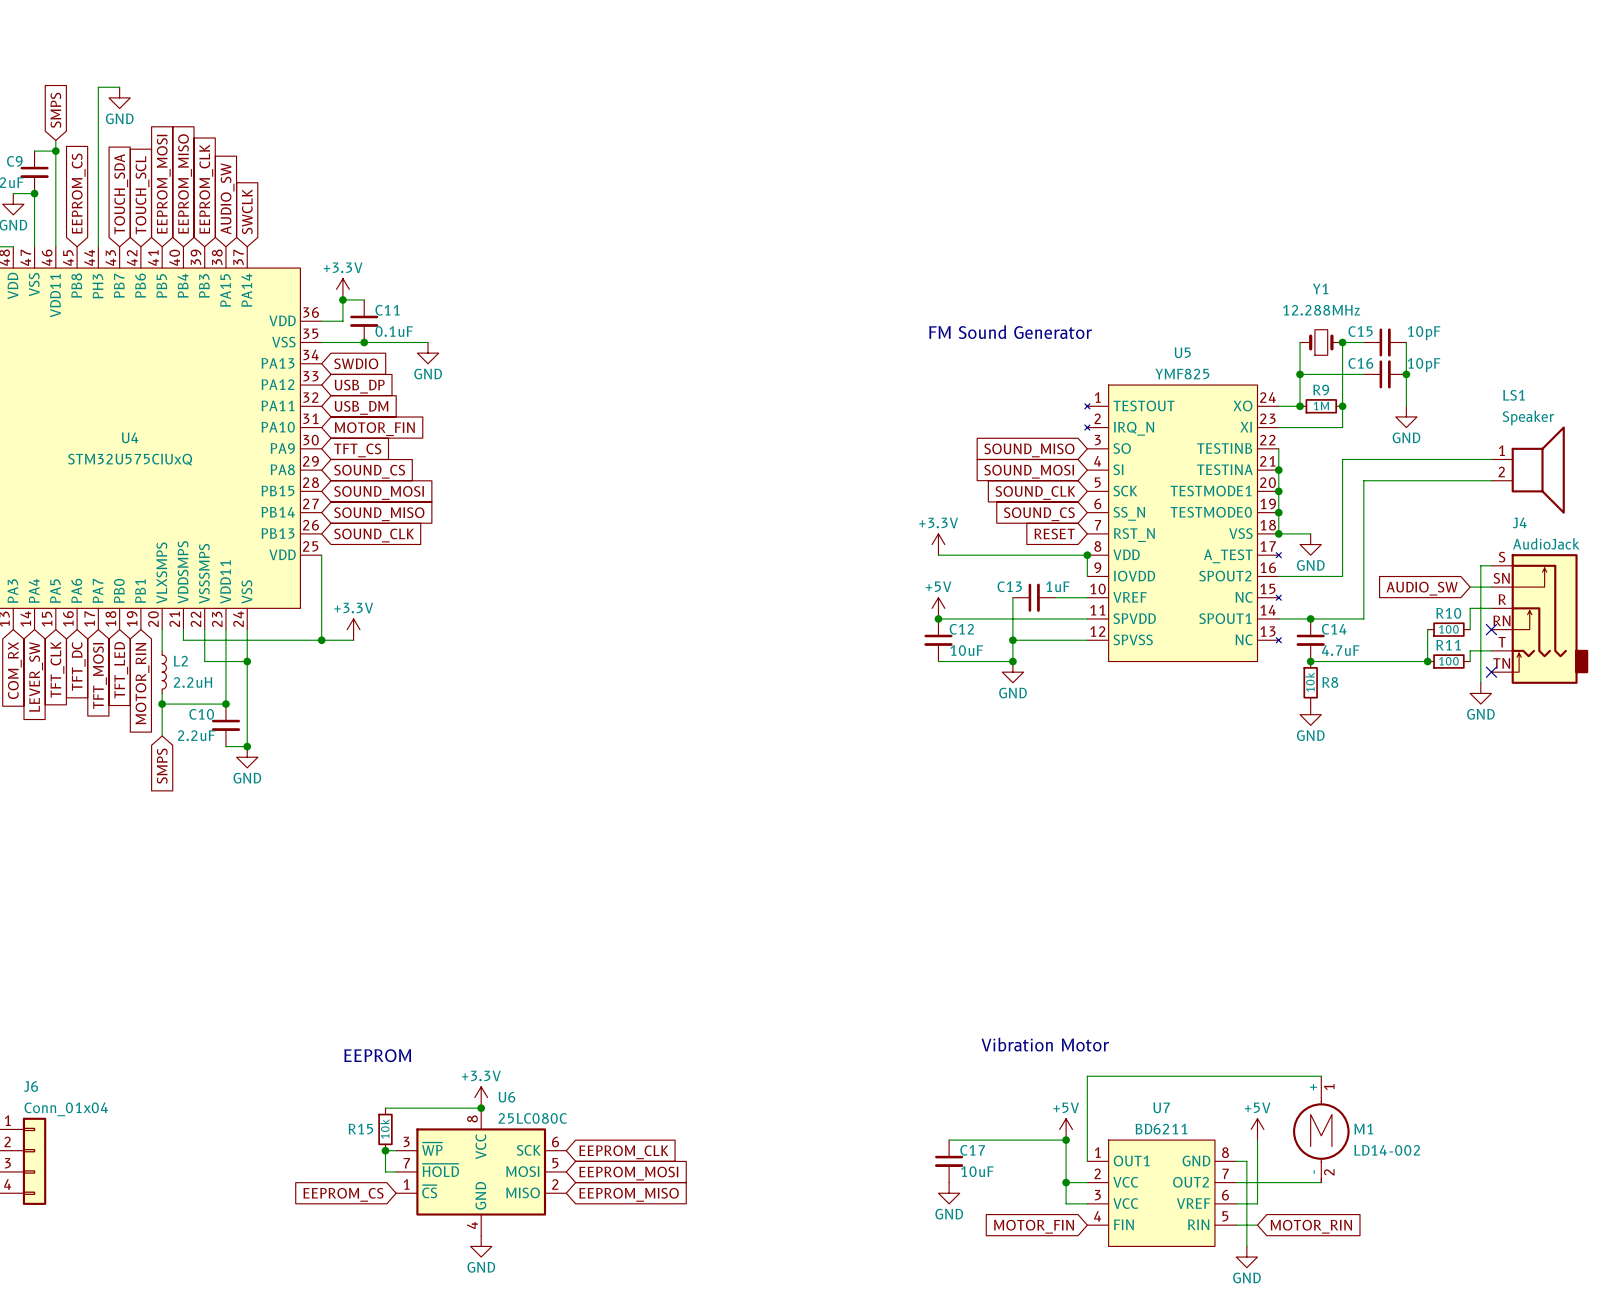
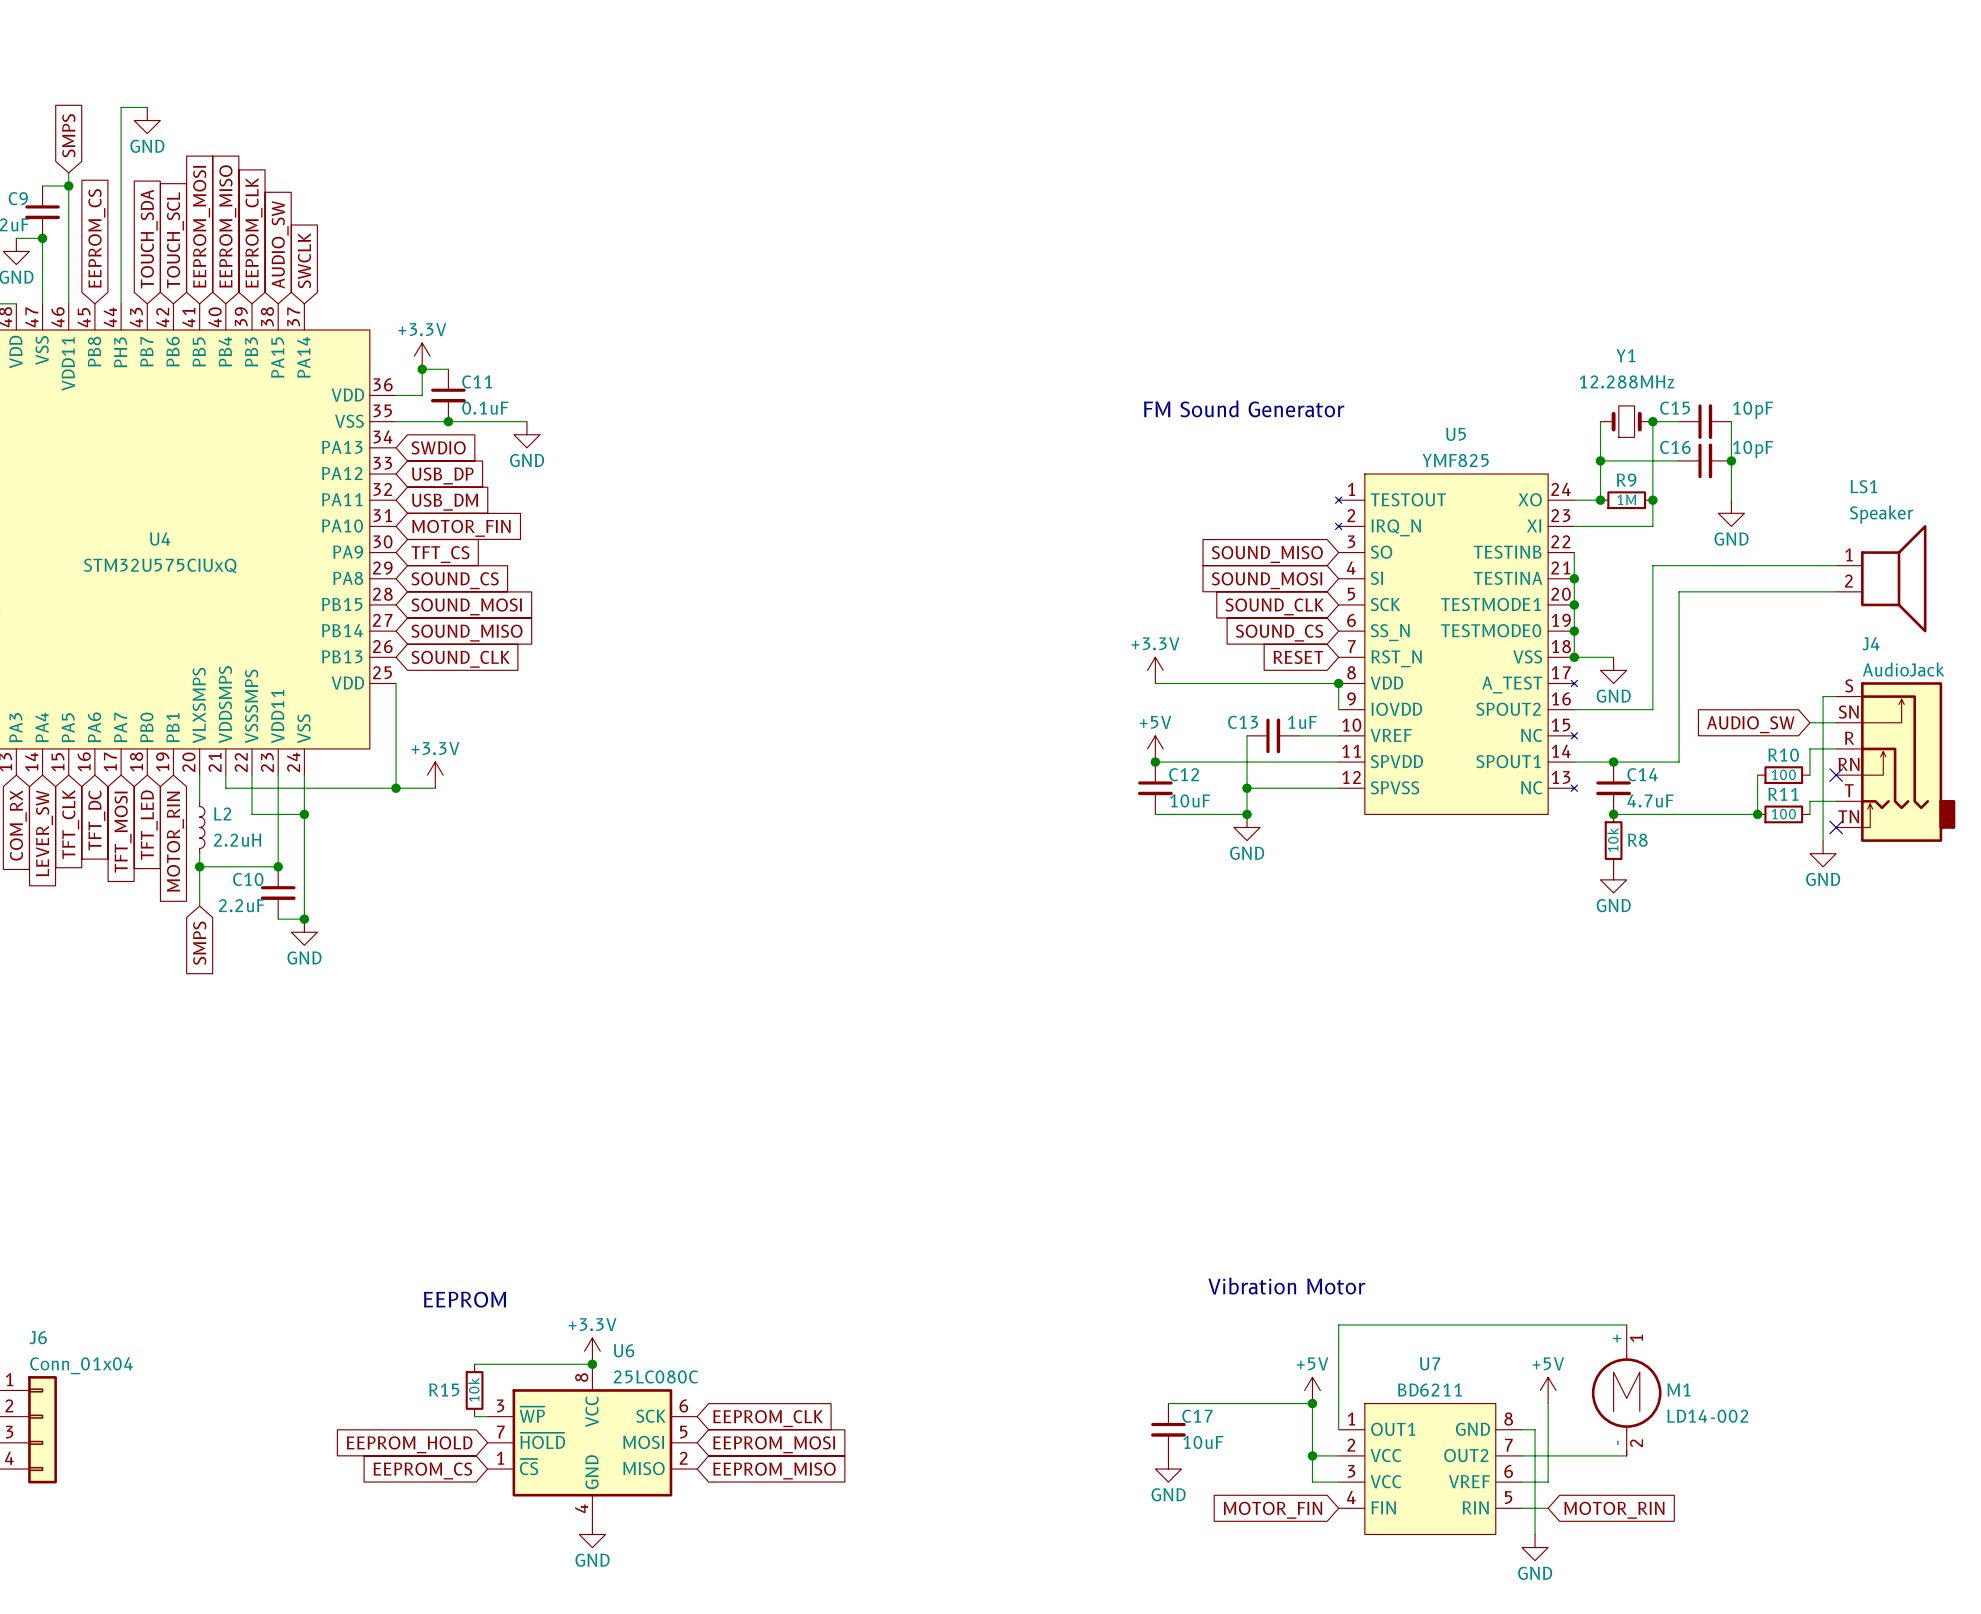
wire: (385, 1150) (385, 1171) (396, 1171) -> none
junction: (385, 1150) -> none
global label: none -> EEPROM_HOLD (409, 1444)

